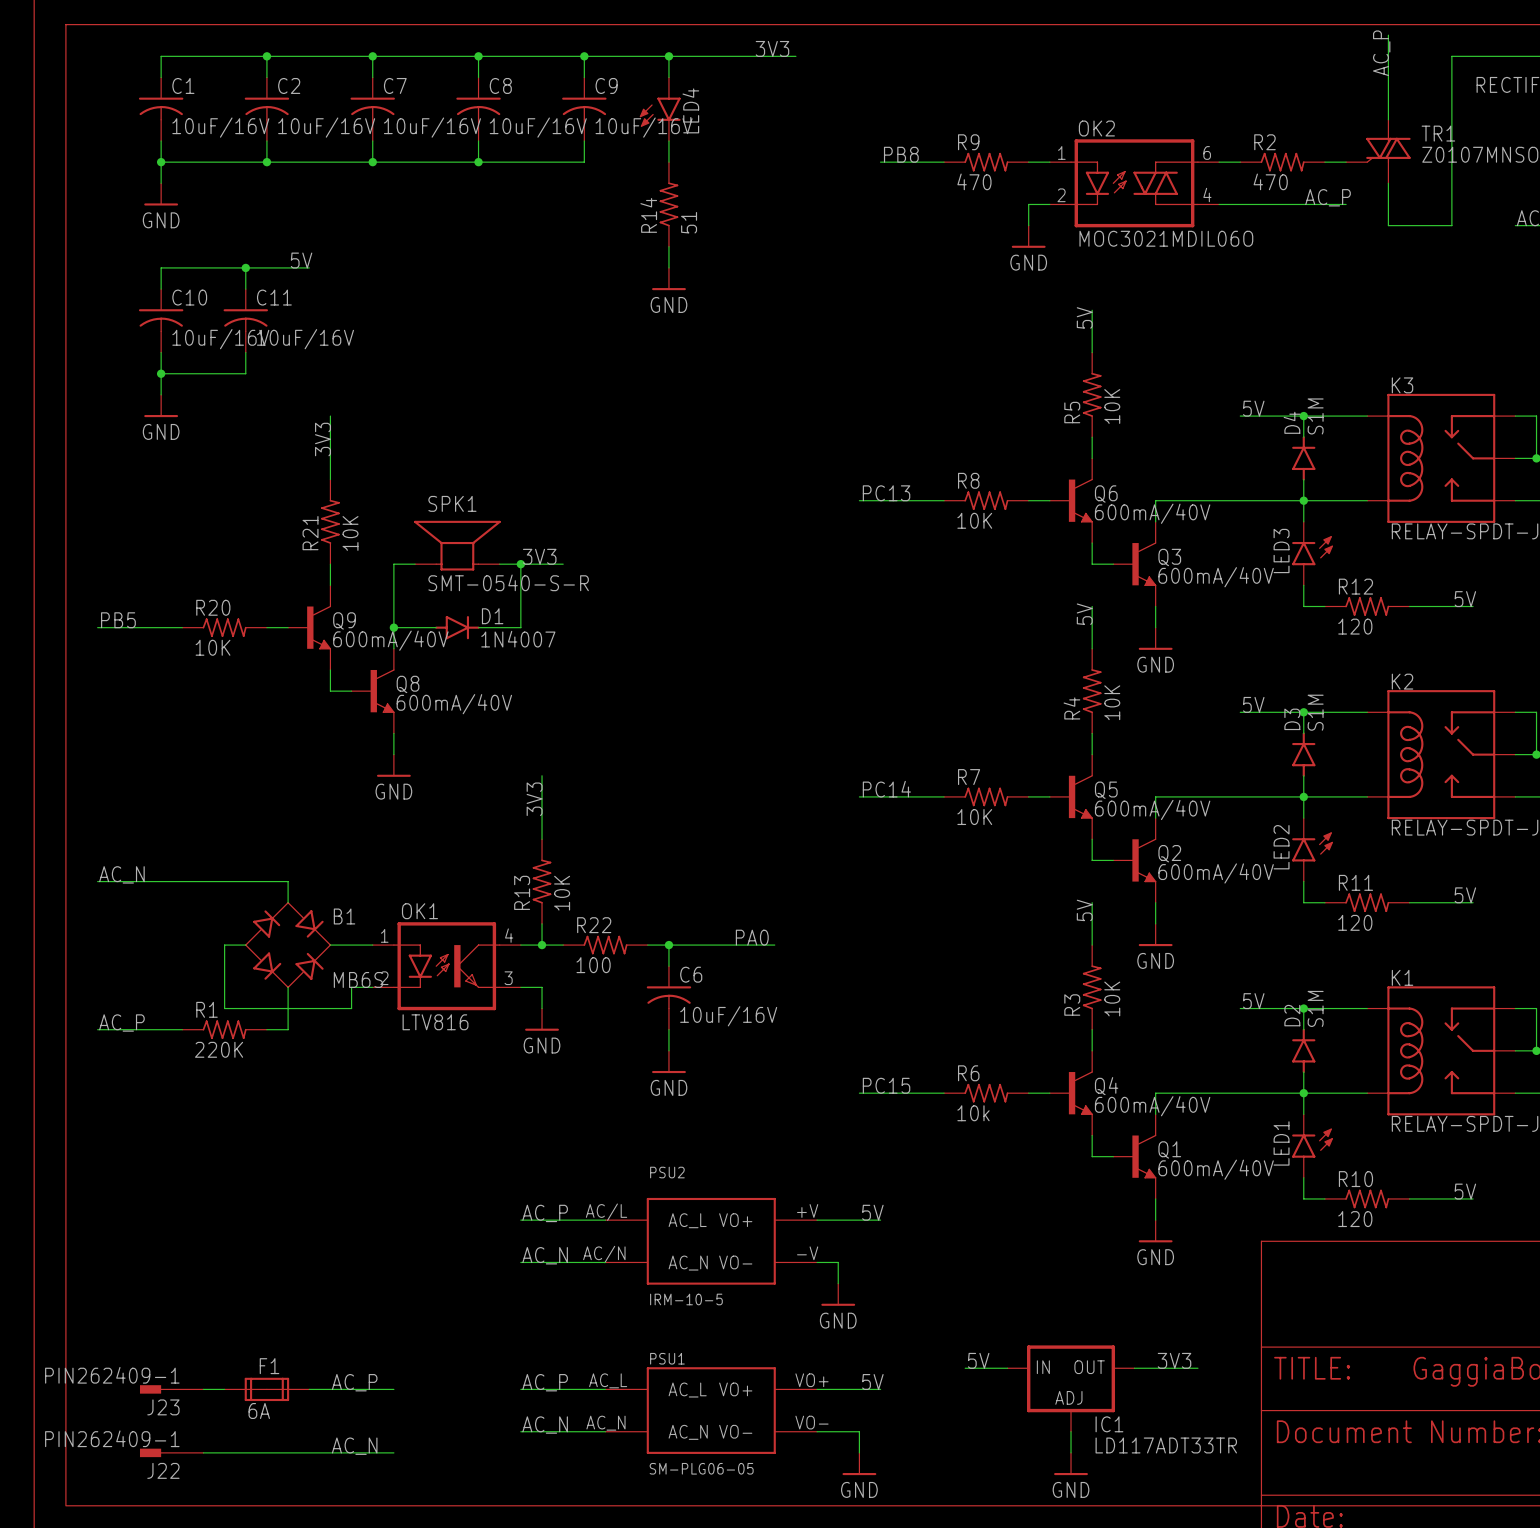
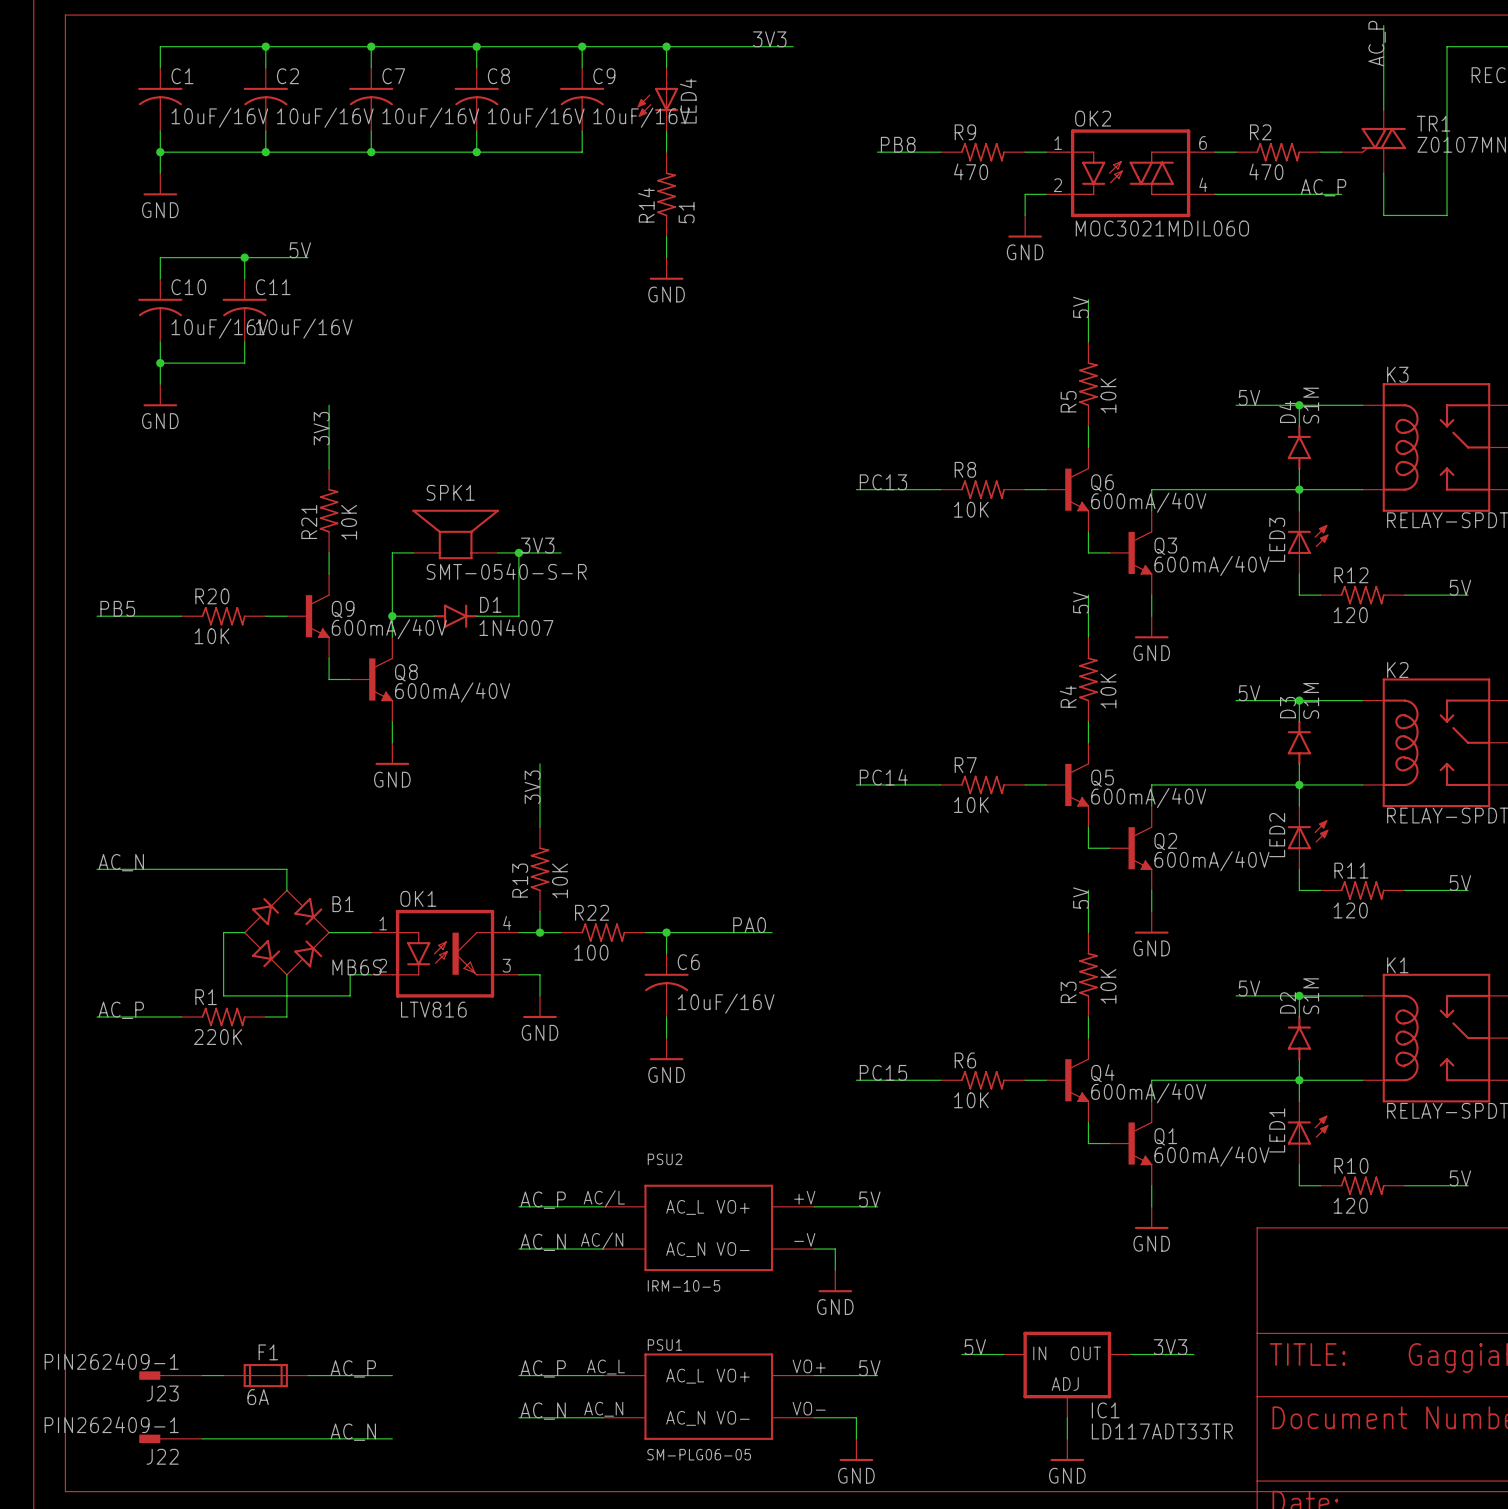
LED4 symbol: [639, 77, 681, 141] -> [637, 67, 679, 132]
LED3 symbol: [1292, 521, 1333, 586] -> [1287, 510, 1329, 575]
LED2 symbol: [1292, 818, 1333, 882] -> [1287, 806, 1329, 870]
R6 value: 10k (973, 1113) -> 10K (971, 1100)
LED1 symbol: [1292, 1114, 1333, 1178] -> [1287, 1101, 1329, 1165]

